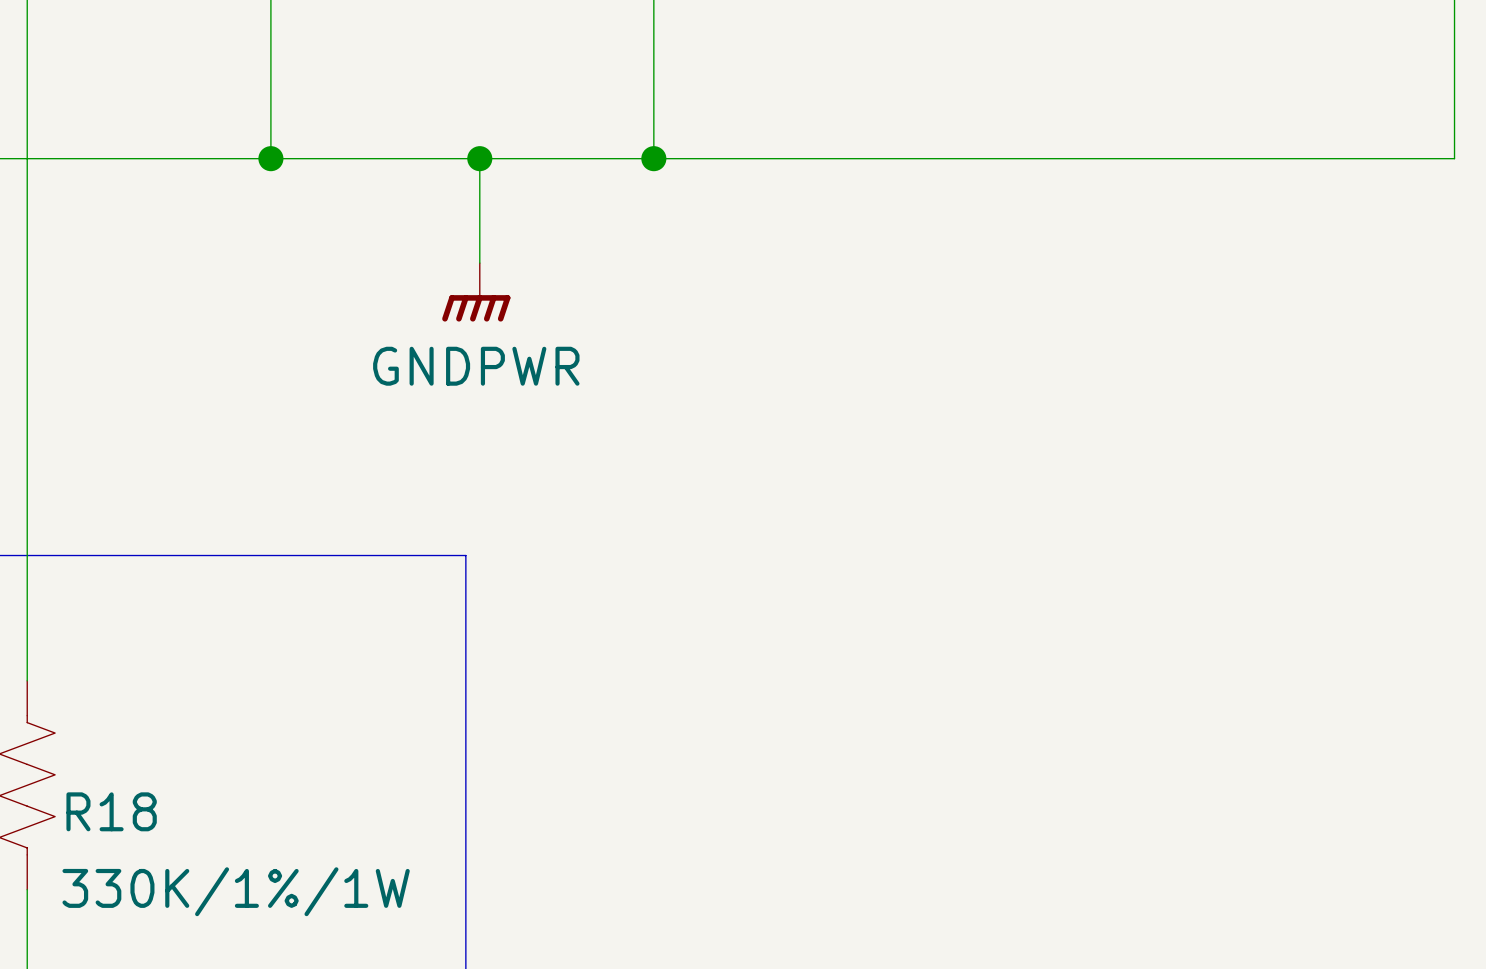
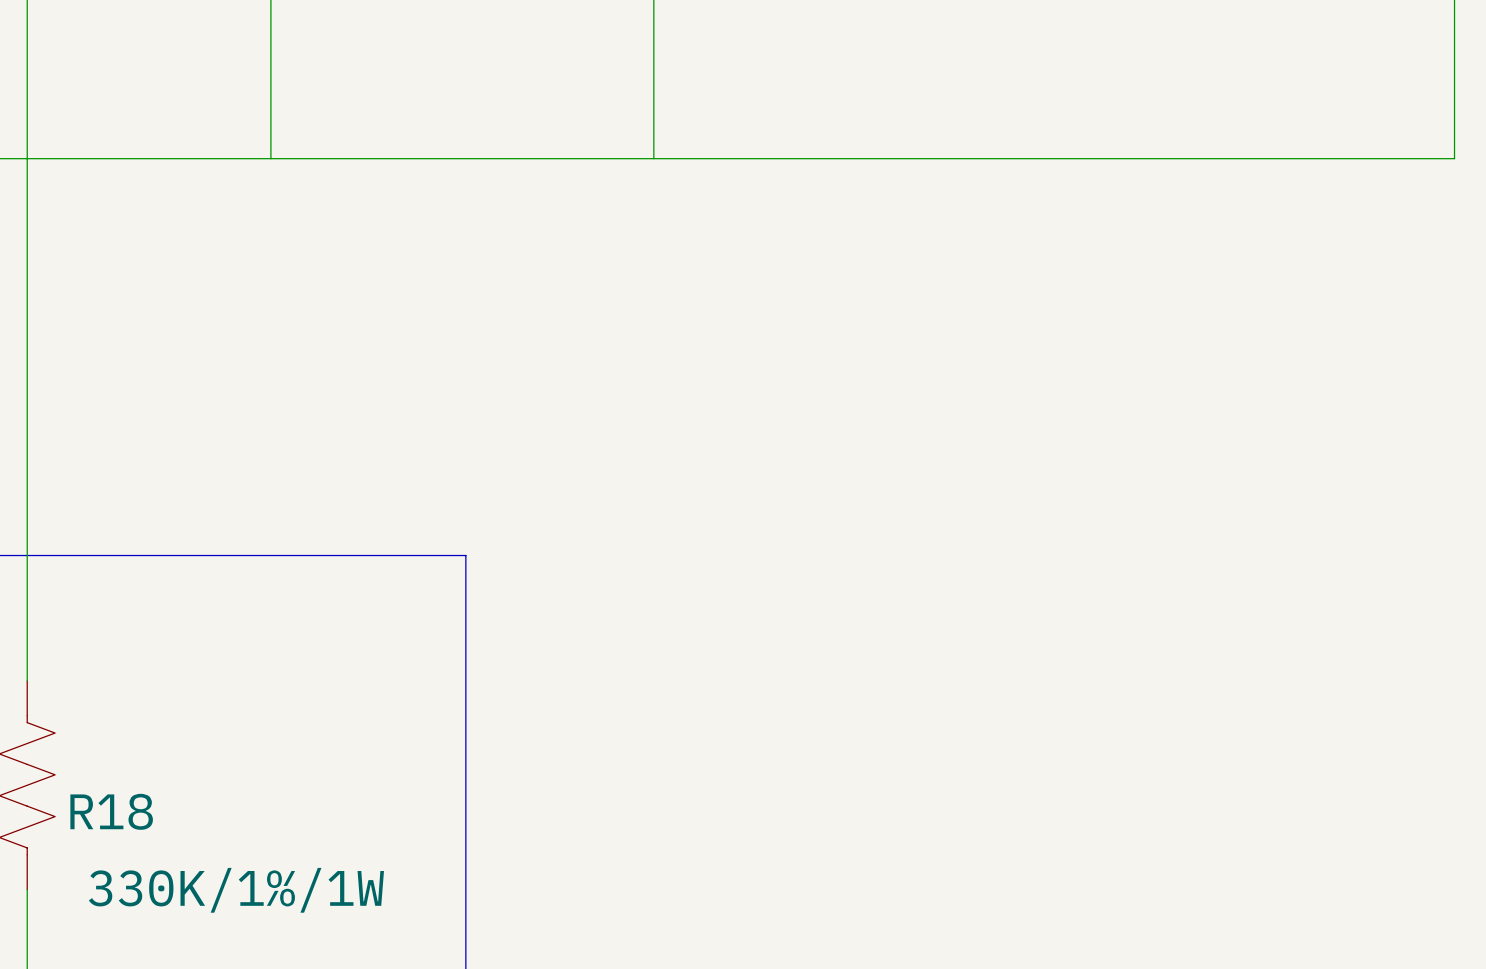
junction: (270, 158) -> none
wire: (479, 158) (479, 263) -> none
junction: (479, 158) -> none
junction: (653, 158) -> none
power symbol: GNDPWR (476, 292) -> none

